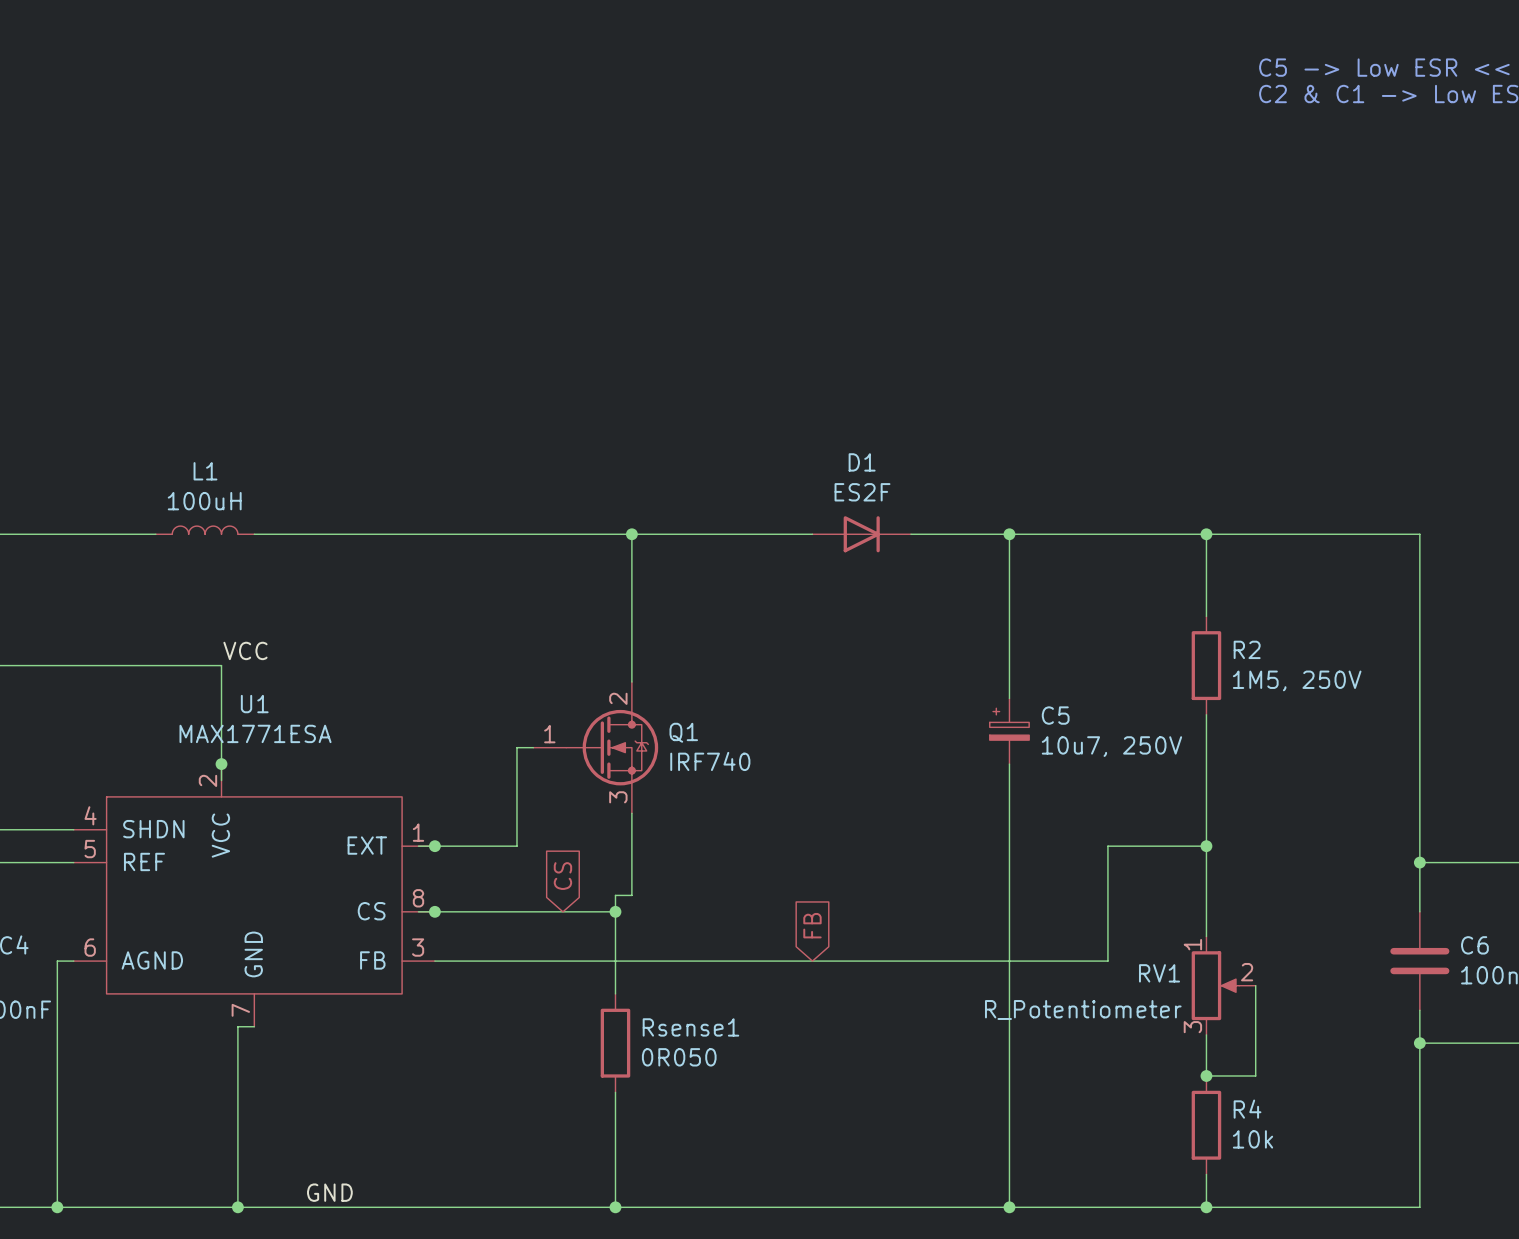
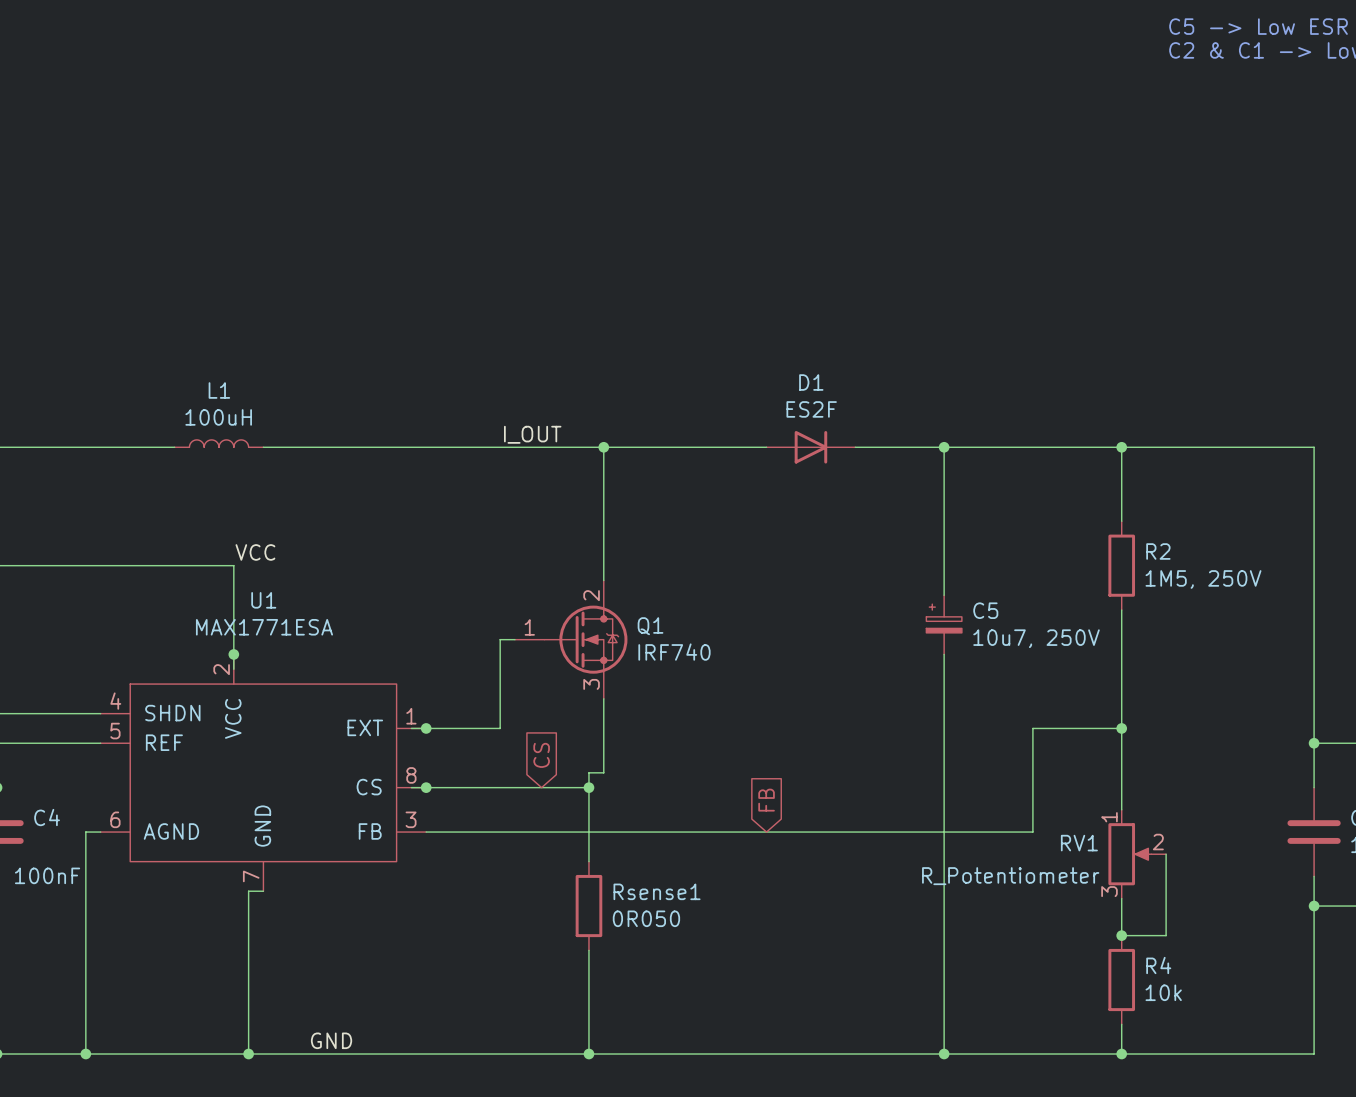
label: none -> I_OUT (532, 434)

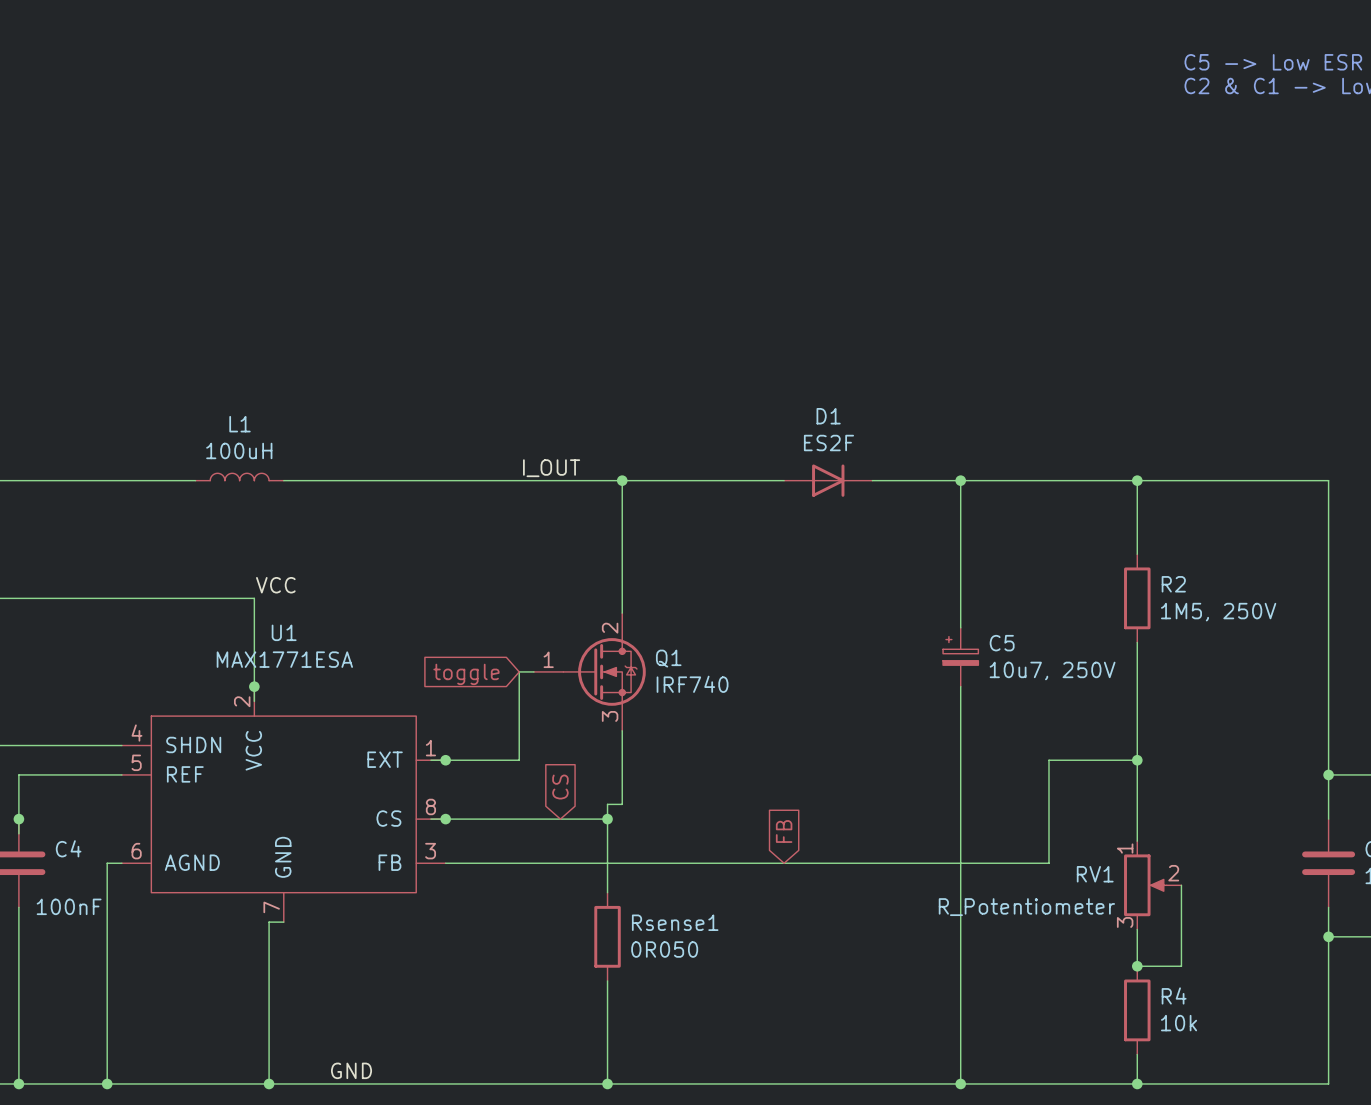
global label: none -> toggle (466, 674)

